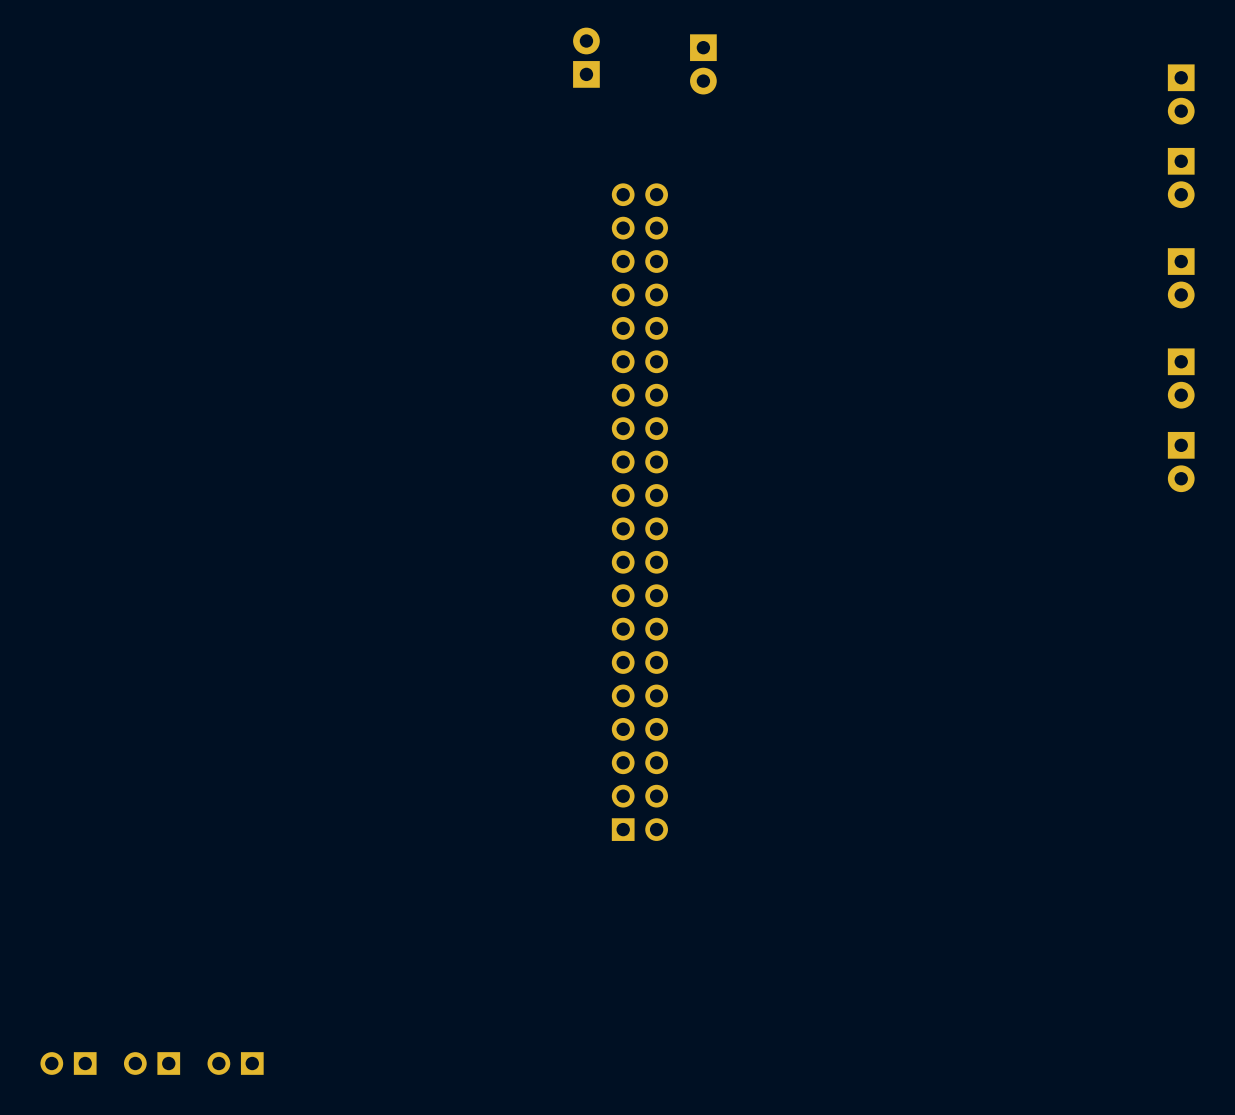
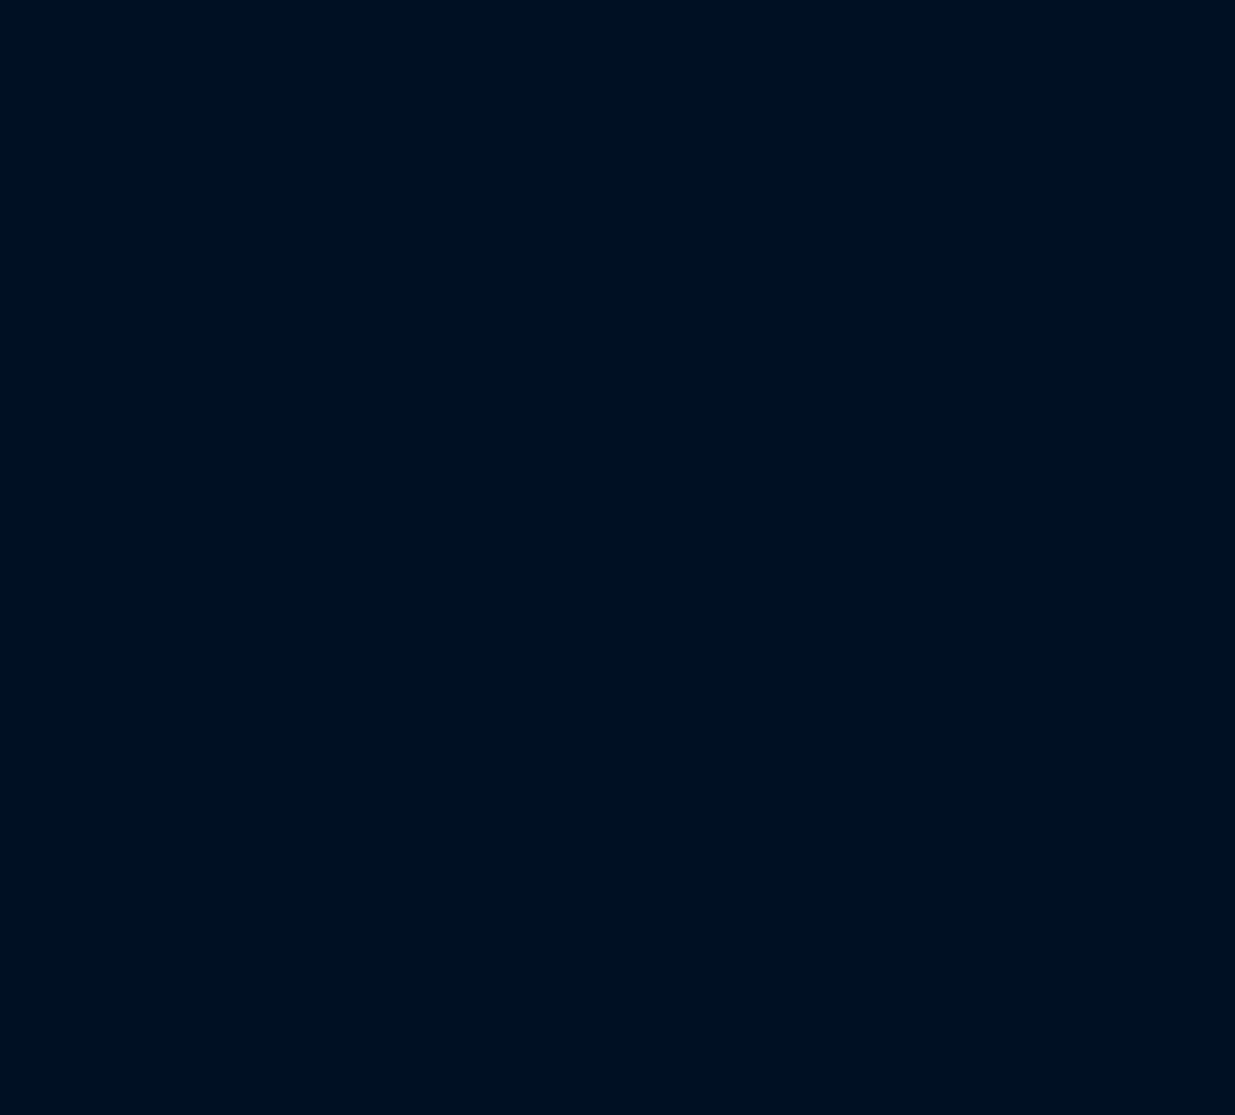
part: (586, 57) -> none
part: (703, 64) -> none
part: (1181, 94) -> none
part: (1181, 178) -> none
part: (1181, 278) -> none
part: (1181, 378) -> none
part: (1181, 462) -> none
part: (639, 512) -> none
part: (68, 1063) -> none
part: (152, 1063) -> none
part: (235, 1063) -> none

